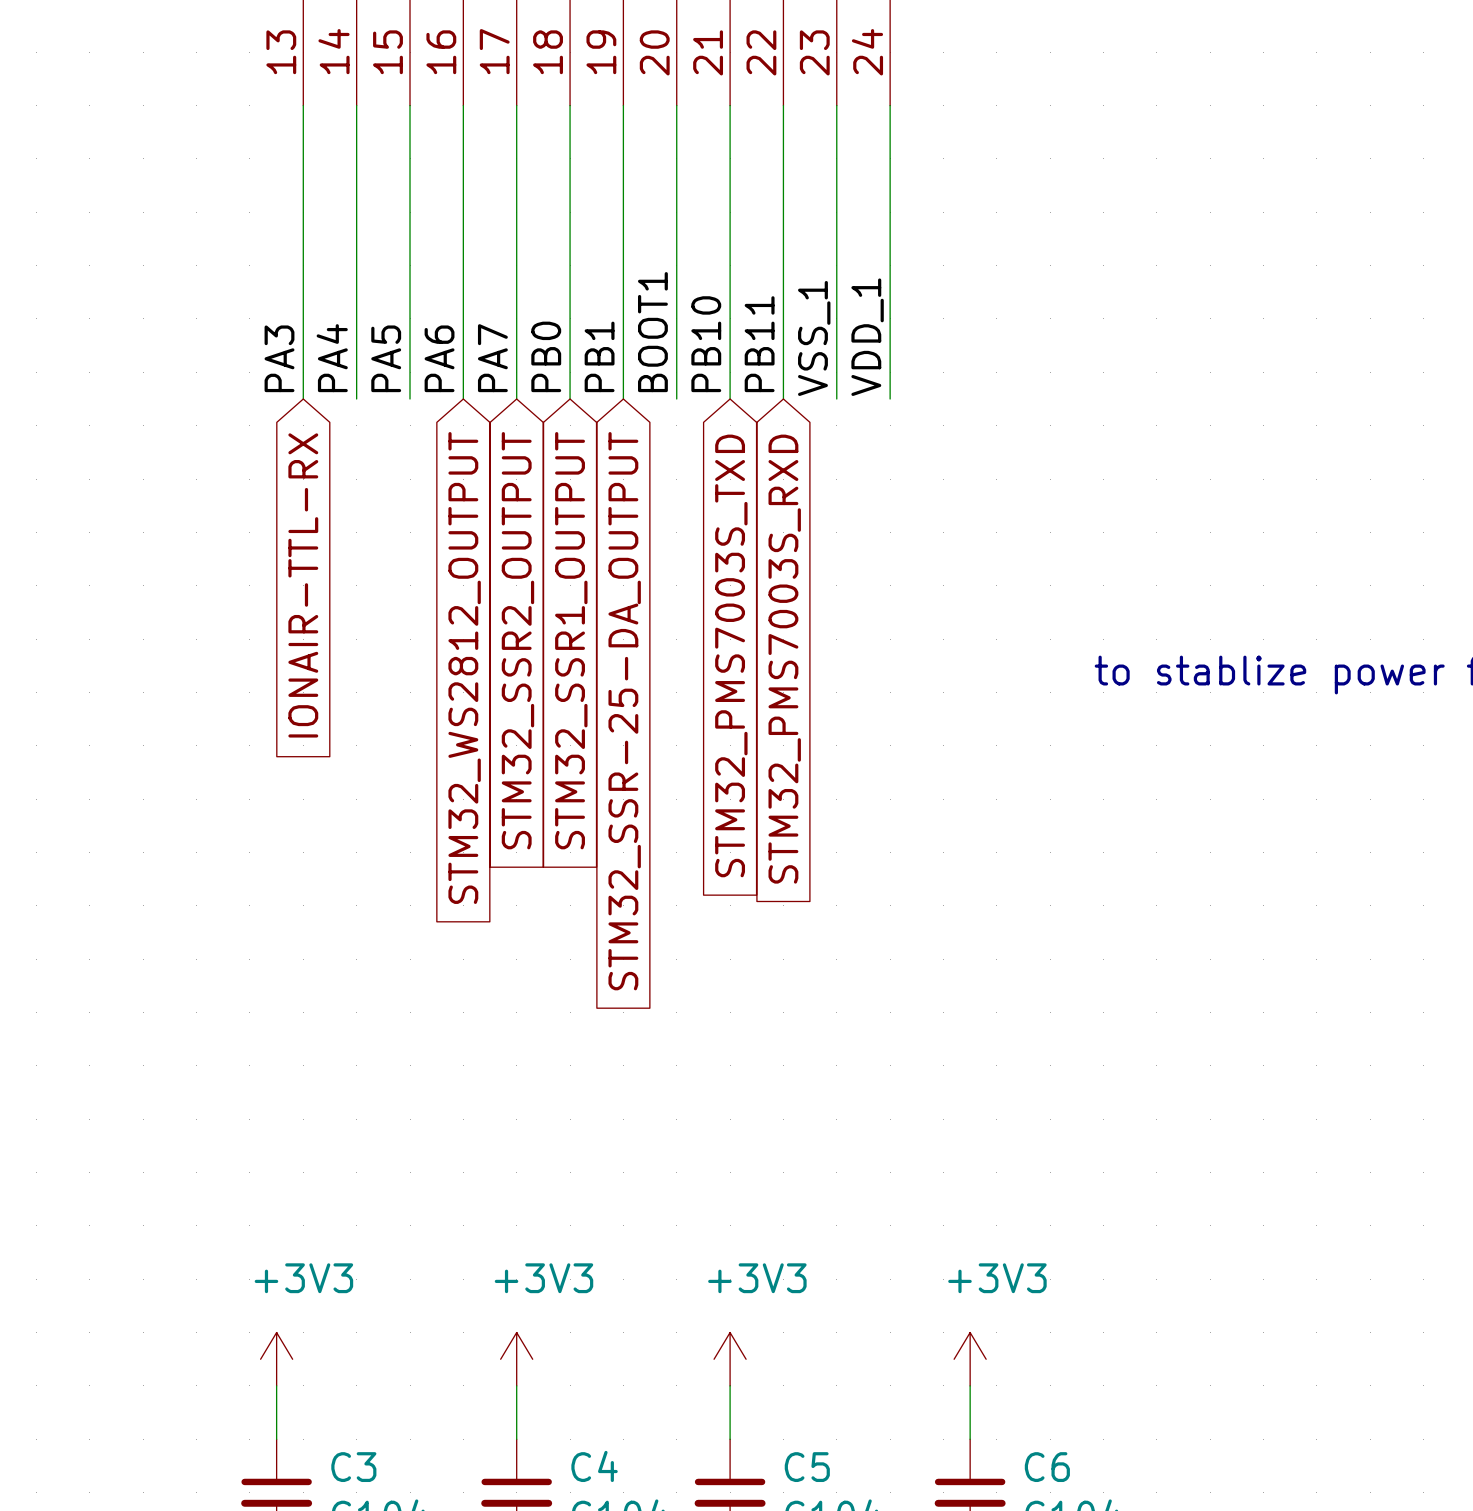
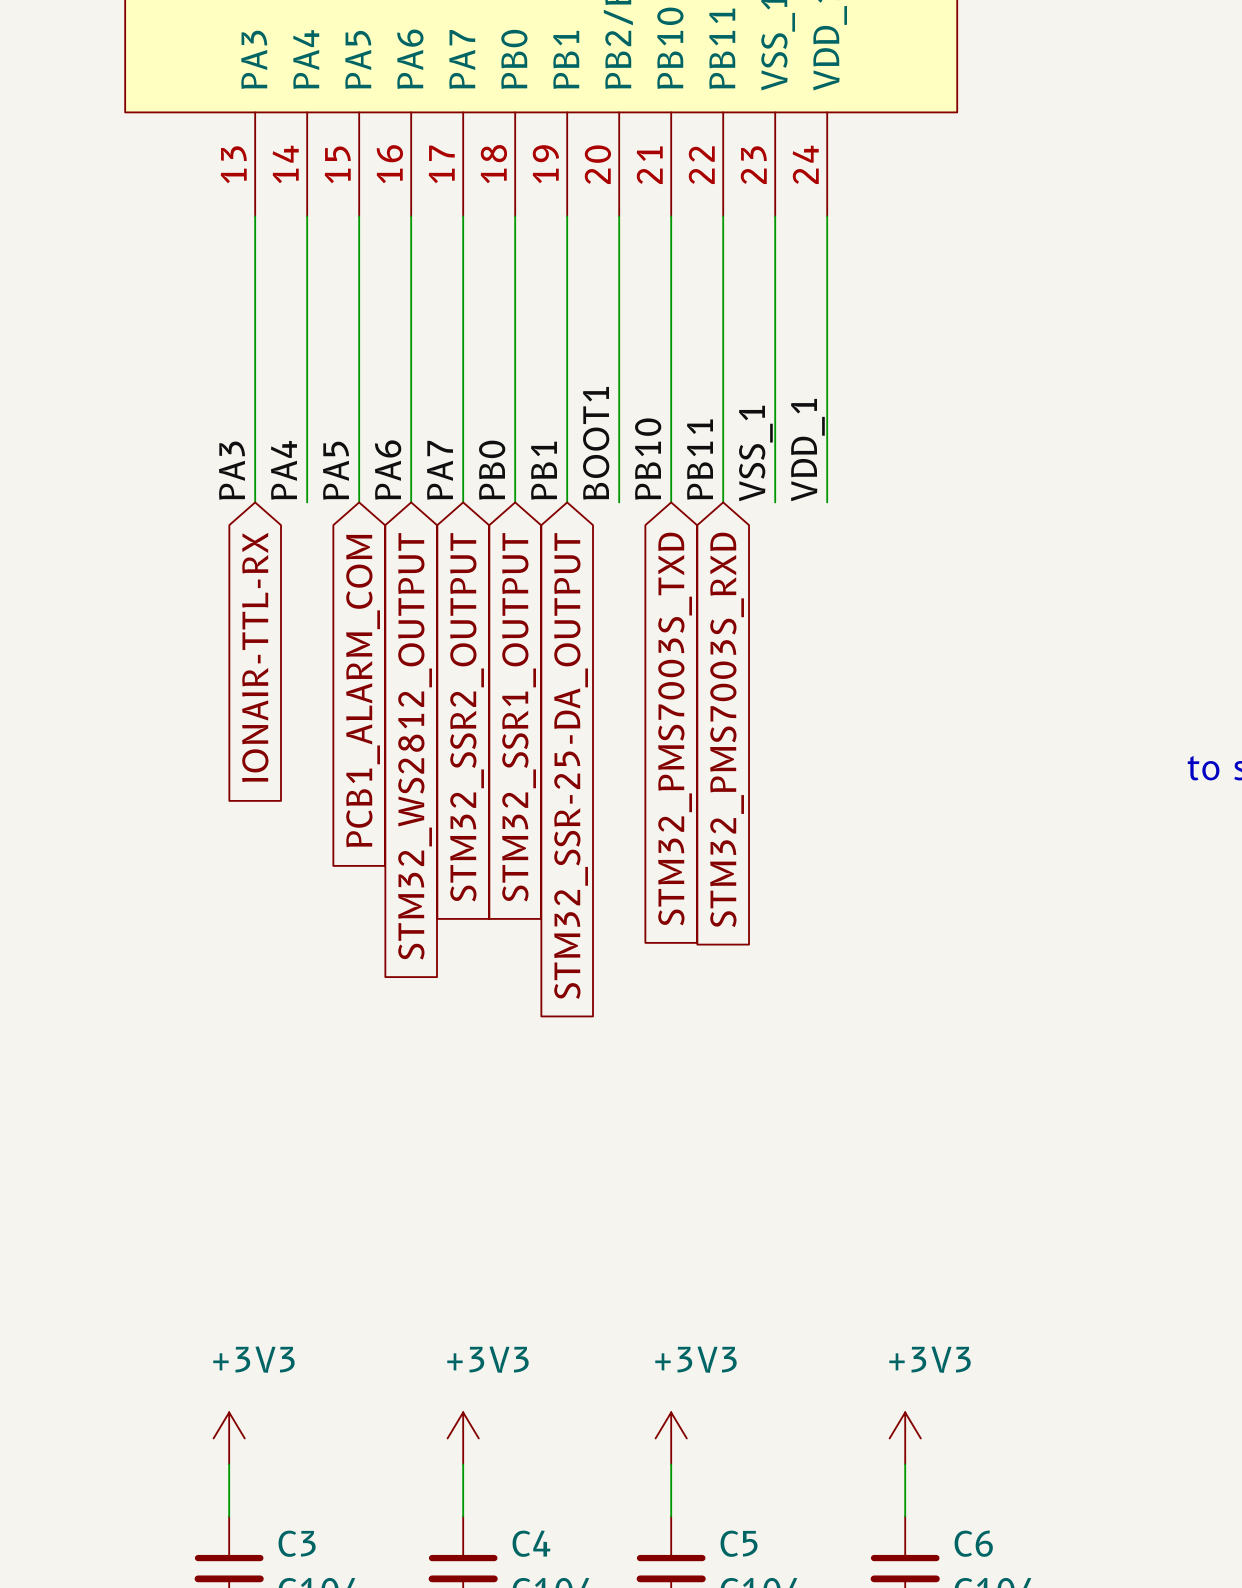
global label: none -> PCB1_ALARM_COM (363, 691)

